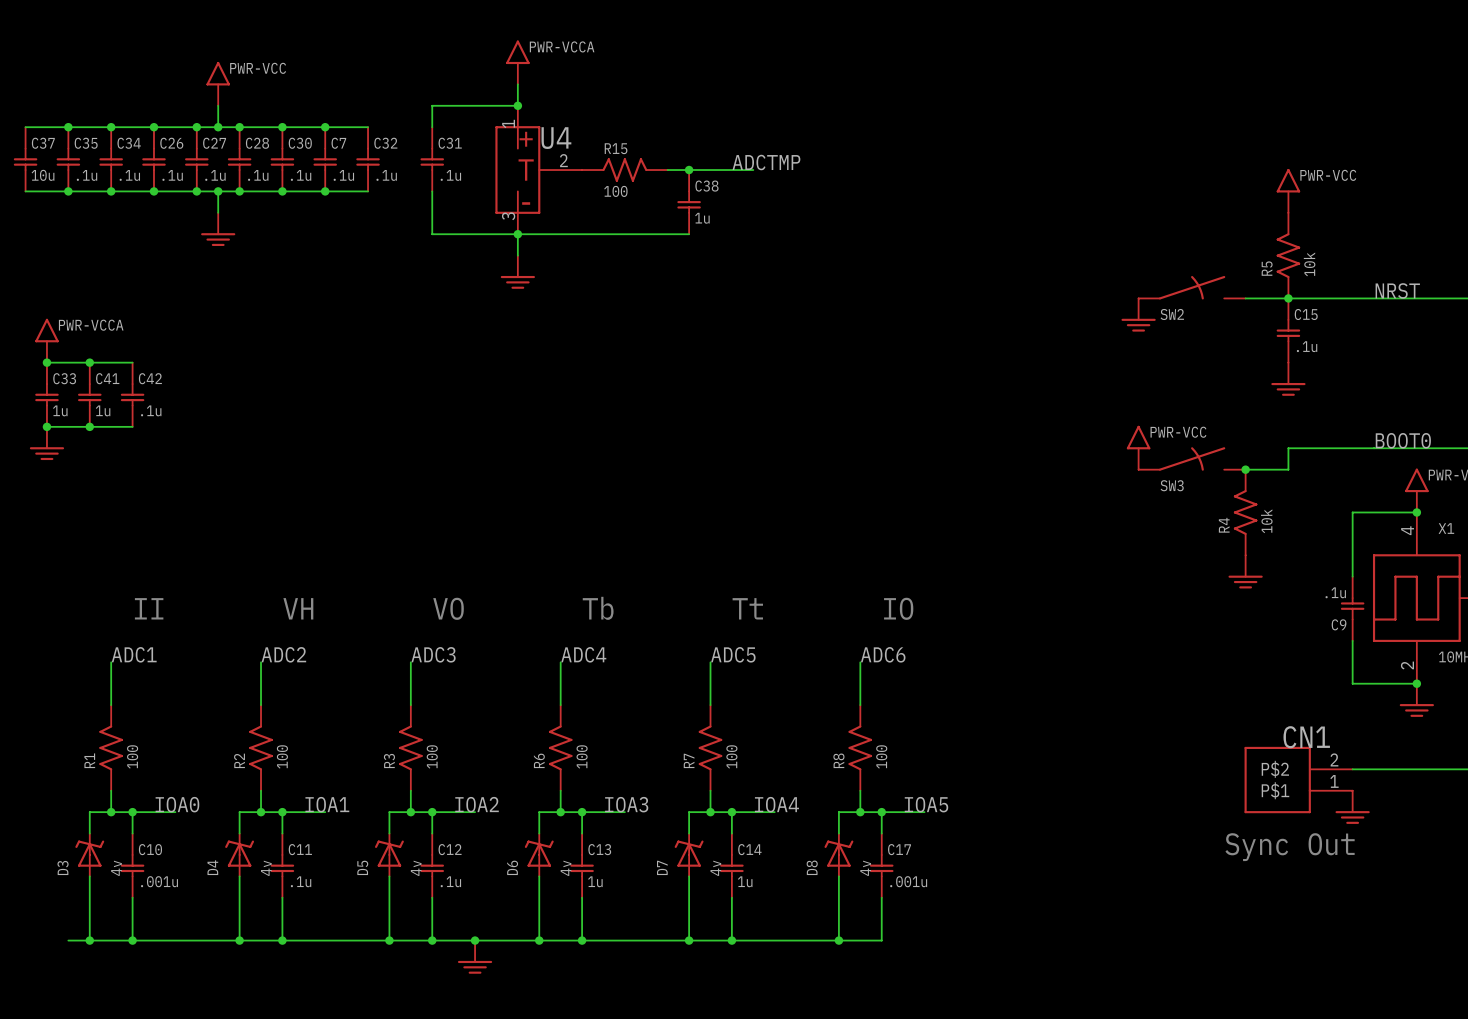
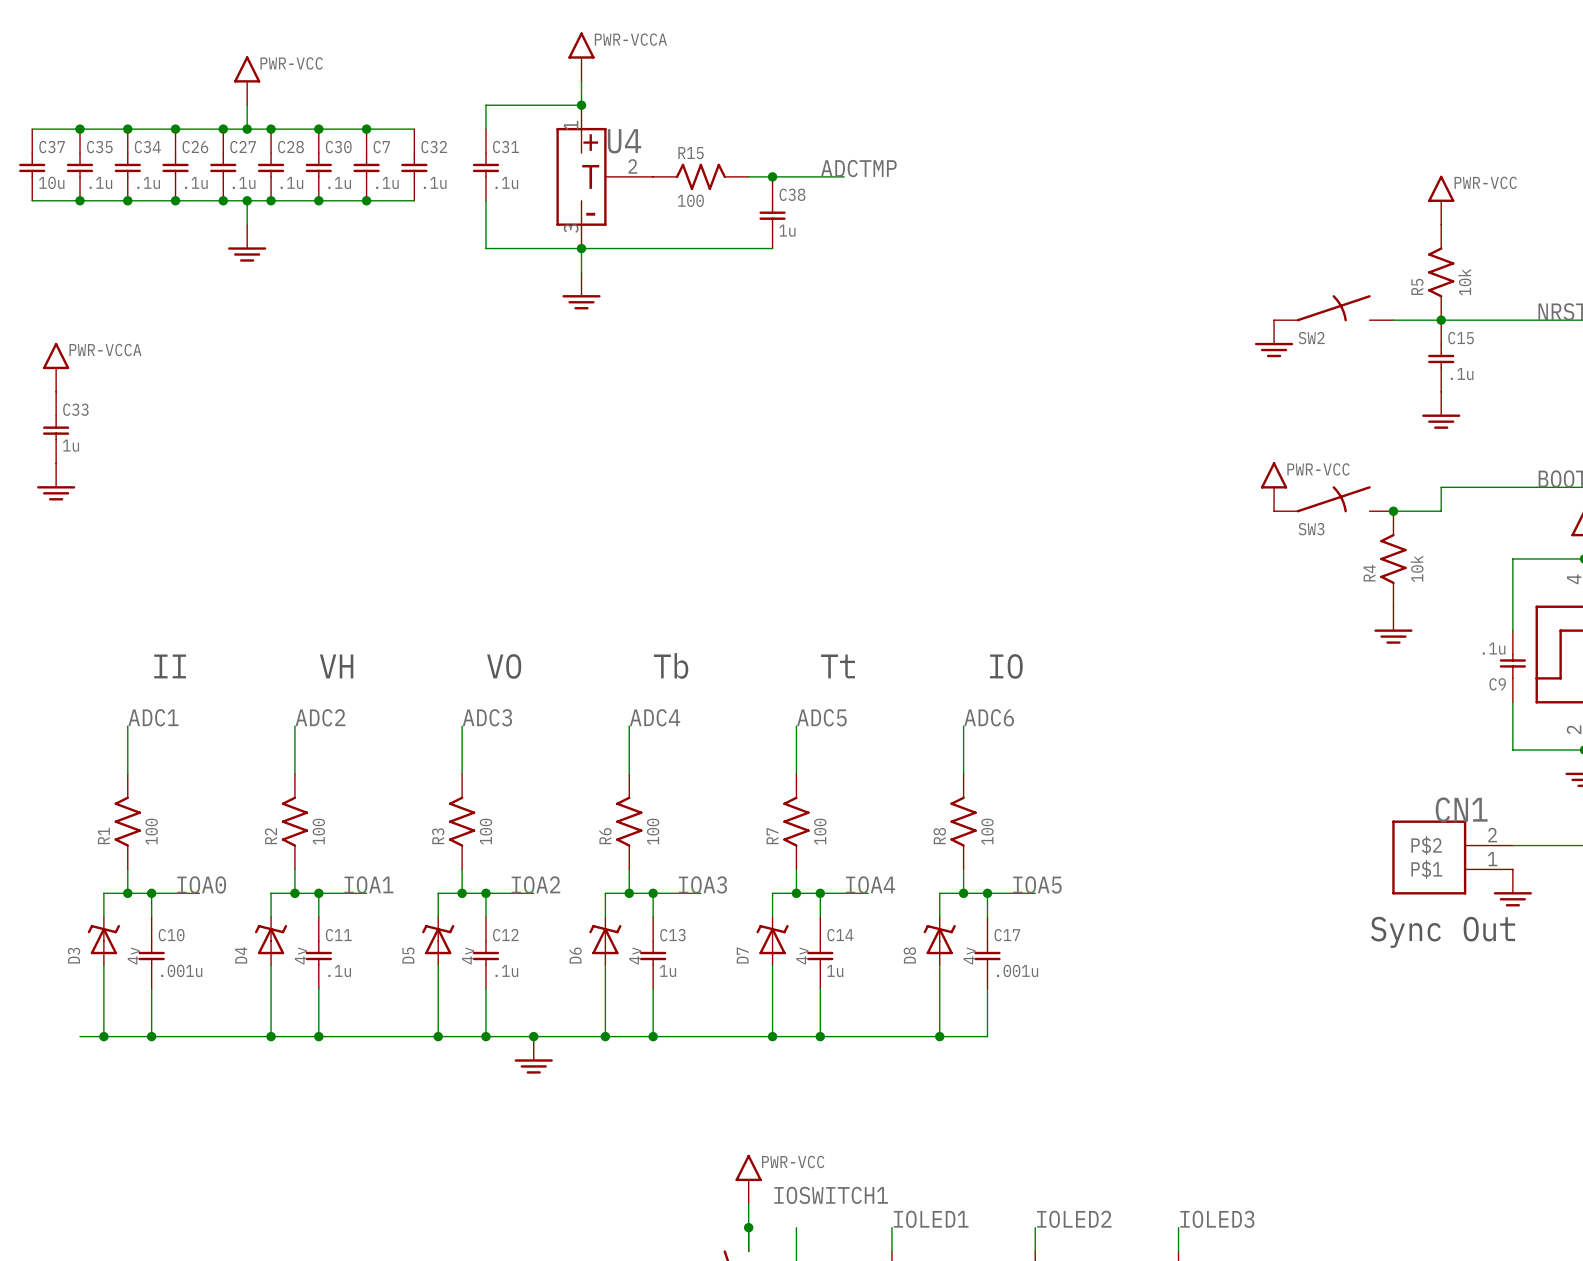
wire: (46, 362) (132, 362) -> none
junction: (46, 362) -> none
junction: (89, 362) -> none
C41: 1u (89, 394) -> none
C42: .1u (132, 394) -> none
wire: (46, 426) (132, 426) -> none
junction: (46, 426) -> none
junction: (89, 426) -> none

